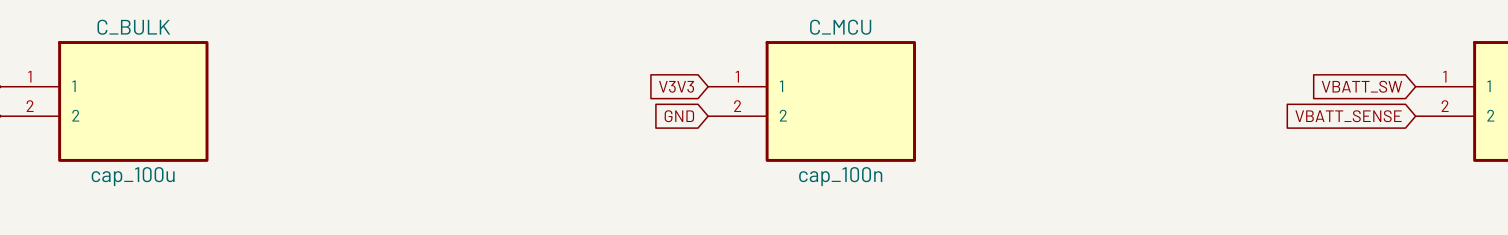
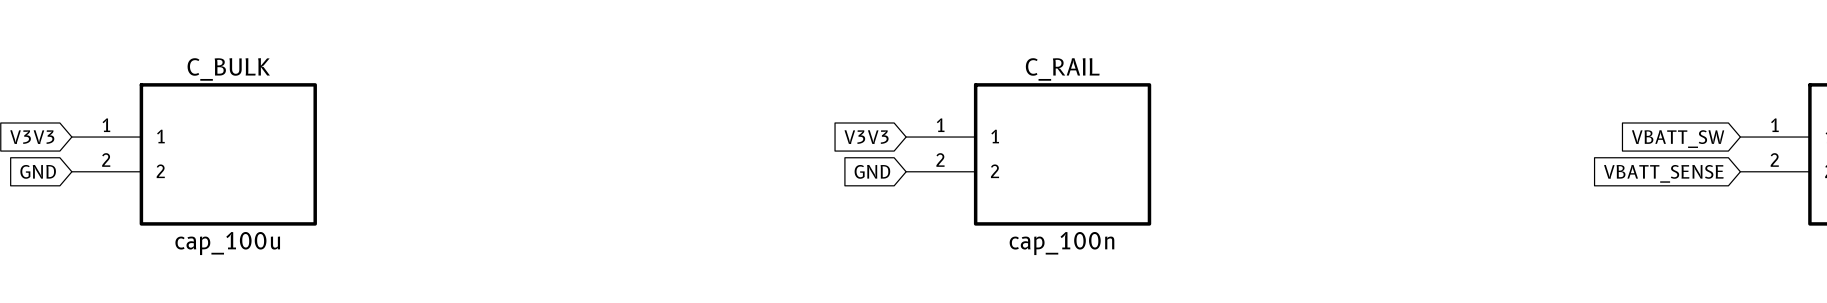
C_MCU name: C_MCU (840, 27) -> C_RAIL (1062, 69)

